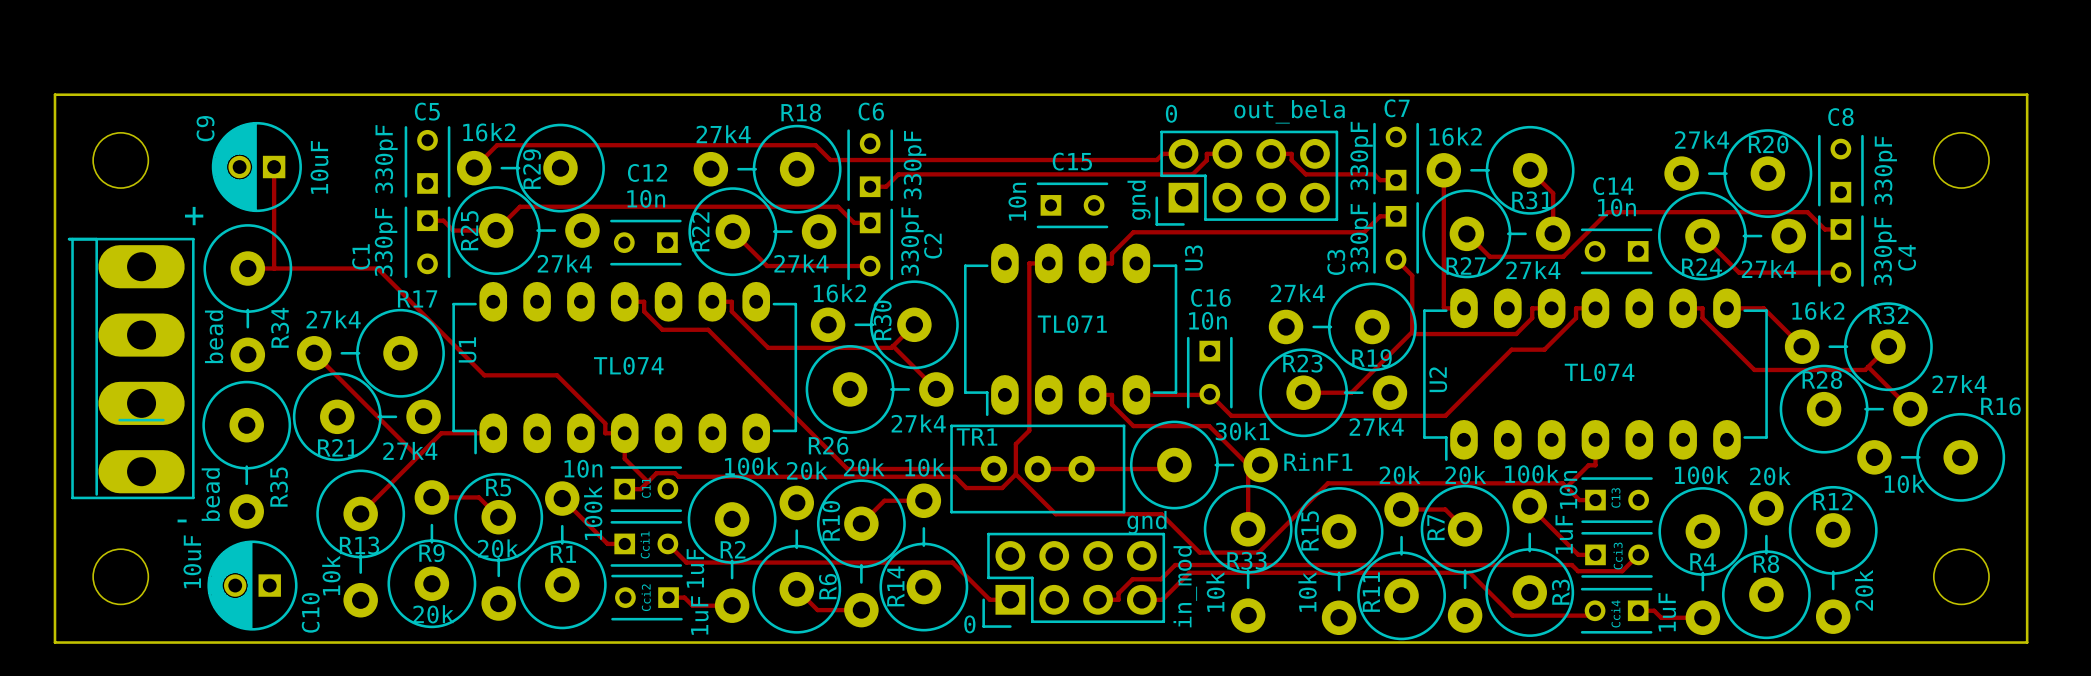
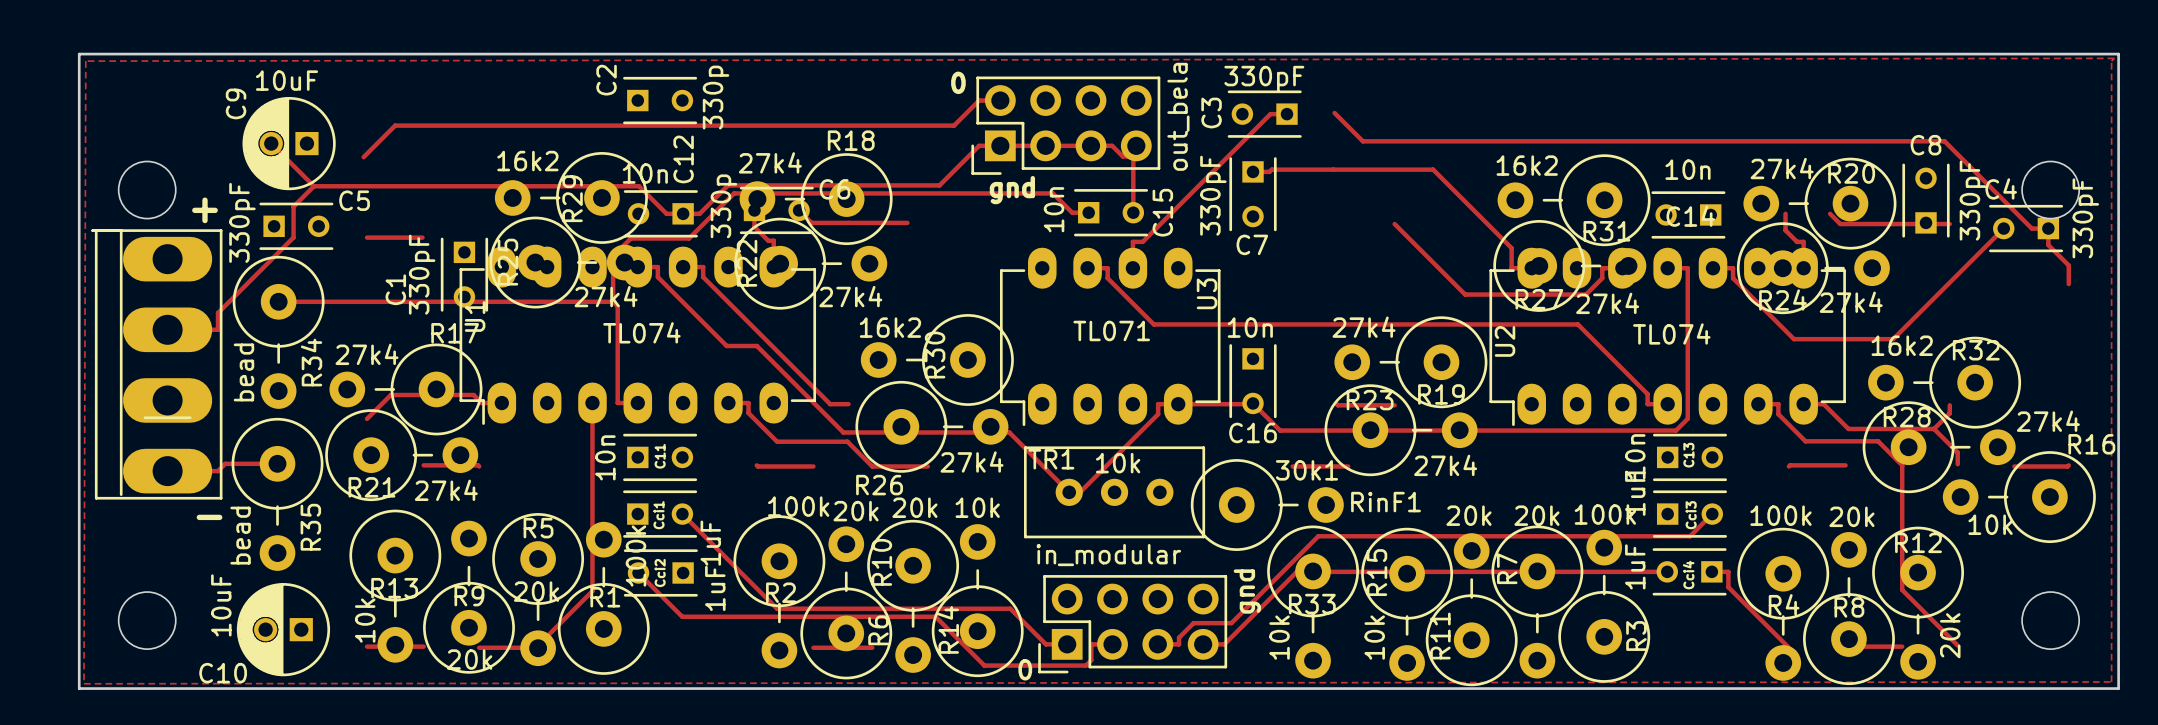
zone outline: none -> (2114, 58) (85, 61) (83, 683) (2111, 681) (2111, 61) (2114, 58)
track: none -> (1000, 100) (979, 100) (954, 125) (395, 125) (363, 157)
track: none -> (1334, 112) (1362, 141) (1944, 141) (2031, 228) (2048, 228) (2048, 245) (2068, 265) (2068, 284)
track: none -> (1287, 114) (1270, 114) (1142, 241) (1132, 241) (1132, 268)
board edge: (54, 94) (2027, 94) -> (79, 122) (79, 54) (2118, 54) (2118, 122)
part value rotation: 0° (1289, 111) -> 90° counterclockwise (1178, 116)
text position: 0 (1171, 113) -> 0 (958, 82)
track: none -> (271, 143) (313, 186)
track: none -> (1136, 145) (1136, 156) (1122, 156) (1112, 145) (979, 145) (939, 185) (728, 185) (699, 213) (666, 213) (639, 186) (313, 186)
track: none -> (1133, 156) (1133, 212)
track: none -> (1253, 171) (1269, 171) (1271, 169) (1433, 169) (1511, 248) (1511, 268) (1531, 268)
track: (1183, 153) (1163, 153) (1156, 160) (830, 160) (815, 145) (497, 145) (474, 168) -> none
track: (1227, 153) (1206, 153) (1206, 160) (1192, 174) (898, 174) (886, 186) (870, 186) -> none
track: (1271, 153) (1291, 153) (1291, 160) (1305, 174) (1374, 174) (1380, 180) (1396, 180) -> none
track: none -> (313, 186) (293, 206) (293, 237) (218, 313) (218, 329) (167, 329)
C7 rotation: 0° (1396, 158) -> 180° (1253, 194)
C7 position: (1396, 158) -> (1253, 194)
text: none -> gnd (1012, 190)
C5 rotation: 0° (427, 161) -> 90° clockwise (296, 226)
C5 position: (427, 161) -> (296, 226)
C15 name rotation: 0° (1072, 161) -> 90° counterclockwise (1162, 212)
C6 rotation: 0° (870, 165) -> 90° clockwise (776, 210)
C6 position: (870, 165) -> (776, 210)
C6 value: 330pF (914, 165) -> 330p (723, 206)
C9 position: (256, 167) -> (289, 143)
track: (274, 167) (274, 268) -> none
C9 value rotation: 0° (319, 167) -> 90° clockwise (286, 80)
C9 value position: 10uF (319, 167) -> 10uF (286, 80)
track: (1443, 170) (1443, 307) (1464, 308) -> none
track: (1530, 170) (1553, 193) (1553, 233) -> none
C12 name rotation: 0° (647, 172) -> 90° counterclockwise (683, 159)
part position: (1246, 178) -> (1065, 125)
track: none -> (754, 210) (754, 226) (768, 240) (773, 240) (773, 267)
track: none -> (799, 210) (811, 222) (907, 222)
track: none -> (1088, 212) (1072, 212) (1052, 193) (734, 193) (689, 238) (630, 238) (613, 256) (613, 301)
track: none -> (1785, 213) (1785, 230) (1797, 241) (1803, 241) (1803, 268)
track: none -> (1830, 213) (1840, 224) (1949, 224)
track: none -> (1394, 224) (1465, 294) (1586, 294) (1602, 278) (1602, 268) (1622, 268)
track: none -> (2003, 228) (1893, 339) (1793, 339) (1733, 278) (1733, 268) (1713, 268)
C12 value position: 10n (646, 198) -> 10n (645, 173)
text: gnd (1139, 200) -> none
C15 position: (1072, 205) -> (1111, 212)
track: none -> (367, 237) (422, 237)
text position: + (194, 216) -> + (204, 210)
track: (1396, 216) (1380, 216) (1364, 232) (1133, 232) (1111, 253) (1111, 263) (1092, 263) -> none
track: (427, 220) (443, 220) (453, 230) (496, 230) (519, 206) (838, 206) (854, 222) (870, 222) -> none
track: (1840, 229) (1824, 229) (1807, 212) (1607, 212) (1563, 256) (1489, 256) (1466, 233) -> none
track: (732, 231) (767, 266) (870, 266) -> none
track: none -> (637, 267) (657, 267) (657, 277) (726, 346) (756, 346) (843, 432) (1009, 432) (1069, 492) (1080, 492) (1158, 414) (1158, 404) (1253, 403) (1280, 430) (1676, 430) (1687, 418) (1687, 268) (1667, 268)
track: none -> (683, 267) (703, 267) (703, 277) (830, 404) (848, 404)
track: none -> (1087, 268) (1107, 268) (1107, 278) (1153, 324) (1577, 324) (1647, 394) (1647, 404) (1667, 404)
track: (1702, 236) (1739, 272) (1840, 272) -> none
C3 rotation: 0° (1396, 237) -> 90° clockwise (1264, 114)
C3 position: (1396, 237) -> (1264, 114)
C2 value: 330pF (912, 241) -> 330p (716, 97)
C12 position: (645, 242) -> (660, 213)
U3 footprint: [964, 243, 1178, 417] -> [999, 247, 1221, 427]
C2 rotation: 0° (870, 244) -> 90° counterclockwise (660, 100)
C2 position: (870, 244) -> (660, 100)
C2 name position: C2 (933, 246) -> C2 (606, 80)
C14 position: (1616, 251) -> (1688, 214)
C4 rotation: 0° (1840, 251) -> 90° clockwise (2026, 228)
C4 position: (1840, 251) -> (2026, 228)
C4 name position: C4 (1907, 257) -> C4 (2001, 188)
U3 name position: U3 (1193, 258) -> U3 (1207, 293)
track: (1396, 259) (1412, 275) (1412, 331) -> none
track: (1048, 263) (1029, 263) (1029, 430) (1015, 444) (1015, 474) -> none
track: (377, 268) (484, 375) (557, 375) (605, 423) (605, 433) (624, 433) (624, 458) (647, 481) -> (412, 301) (613, 301)
track: none -> (613, 301) (617, 306) (617, 403) (637, 403)
U1 footprint: [452, 281, 798, 455] -> [459, 246, 817, 425]
U2 footprint: [1423, 288, 1768, 461] -> [1489, 247, 1846, 427]
C16 name position: C16 (1210, 297) -> C16 (1253, 432)
track: (624, 301) (644, 301) (644, 311) (662, 329) (708, 329) (847, 469) (993, 469) -> none
track: (712, 301) (731, 301) (731, 311) (768, 347) (891, 347) (914, 324) -> none
track: (1551, 308) (1532, 308) (1532, 318) (1516, 334) (1414, 334) (1412, 331) -> none
track: (1595, 308) (1576, 308) (1576, 318) (1544, 349) (1511, 349) (1445, 415) (1231, 415) (1209, 394) (1136, 394) -> none
track: (1683, 308) (1702, 308) (1702, 318) (1754, 369) (1865, 369) (1888, 346) -> none
track: (1726, 308) (1763, 308) (1802, 346) -> none
track: (1412, 331) (1351, 392) (1303, 392) -> none
track: (893, 346) (936, 389) -> none
track: (314, 353) (417, 456) -> none
track: none -> (501, 403) (481, 403) (473, 395) (390, 395) (367, 418)
track: none -> (592, 403) (592, 591) (535, 647) (479, 647)
track: none -> (728, 403) (748, 403) (748, 413) (777, 441) (847, 441) (872, 466) (927, 466)
track: (1868, 366) (1910, 409) -> none
track: none -> (1336, 404) (1394, 405)
track: none -> (1758, 404) (1778, 404) (1778, 414) (1805, 441) (1878, 441) (1902, 465) (1902, 589) (1957, 645)
track: none -> (1803, 404) (1823, 404) (1848, 428) (1934, 428)
part position: (131, 368) -> (156, 364)
track: none -> (1949, 405) (1949, 413) (1934, 428)
C16 position: (1209, 372) -> (1253, 381)
track: none -> (1934, 428) (1957, 452) (1957, 464)
track: (1092, 394) (1111, 394) (1111, 404) (1133, 426) (1209, 426) (1248, 465) -> none
TR1 value: none -> 10k (1118, 463)
track: none -> (277, 463) (225, 463) (218, 471) (167, 471)
track: none -> (423, 465) (479, 466)
track: none -> (756, 465) (813, 466)
track: none -> (1845, 465) (1788, 466)
track: none -> (2068, 465) (2014, 466)
track: none -> (1292, 466) (1348, 466)
track: (493, 433) (441, 433) (360, 513) -> none
track: (1595, 439) (1595, 465) (1588, 465) (1566, 487) -> none
track: (1174, 465) (1170, 469) (1037, 469) -> none
track: (1248, 465) (1248, 529) -> none
C11 value rotation: 0° (583, 468) -> 90° counterclockwise (605, 457)
TR1 position: (1037, 469) -> (1114, 492)
track: (1015, 474) (1055, 514) (1161, 514) (1199, 552) (1258, 552) (1327, 483) (1562, 483) (1579, 500) (1595, 500) -> none
track: (1015, 474) (1002, 488) (966, 488) (955, 476) (678, 476) (674, 473) (656, 473) (640, 489) (624, 489) -> none
C11 position: (646, 489) -> (660, 457)
C13 value position: 10n (1568, 489) -> 10n (1635, 456)
track: (431, 497) (478, 497) (498, 517) -> none
track: (562, 498) (607, 543) (624, 543) -> none
track: (923, 500) (884, 500) (861, 523) -> none
C13 position: (1617, 500) -> (1689, 457)
track: (1529, 506) (1578, 554) (1595, 554) -> none
track: (1401, 509) (1445, 509) (1465, 529) -> none
text position: - (182, 520) -> - (209, 517)
text rotation: 0° (1146, 522) -> 90° counterclockwise (1247, 591)
track: none -> (1711, 571) (1728, 571) (1728, 587) (1788, 647)
track: none -> (638, 572) (682, 616) (935, 616) (984, 665) (1086, 665) (1091, 660) (1091, 644) (1112, 644)
Cci1 position: (646, 543) -> (660, 514)
track: (667, 543) (686, 562) (952, 562) (955, 565) -> (682, 514) (777, 608) (1010, 608)
Cci3 position: (1617, 554) -> (1689, 514)
track: (1638, 554) (1622, 571) (1578, 571) (1571, 565) (1175, 565) (1160, 579) -> (1712, 514) (1690, 536) (1318, 536) (1231, 623) (1222, 623)
track: (1189, 572) (1469, 572) (1512, 615) (1590, 615) (1595, 610) -> (1252, 616) (1296, 571) (1667, 571)
part value: in_mod (1185, 586) -> in_modular (1108, 555)
track: (796, 589) (817, 610) (861, 610) -> none
Cci2 position: (646, 597) -> (660, 572)
track: (668, 597) (684, 597) (692, 605) (732, 605) -> none
track: none -> (367, 646) (423, 646)
track: none -> (1845, 646) (1902, 646)
track: none -> (813, 647) (872, 647)
Cci4 position: (1616, 610) -> (1689, 571)
track: (1638, 610) (1654, 610) (1661, 617) (1702, 617) -> none
C10 name rotation: 0° (310, 612) -> 90° clockwise (223, 673)
C10 name position: C10 (310, 612) -> C10 (223, 673)
Cci4 value position: 1uF (1667, 612) -> 1uF (1635, 566)

